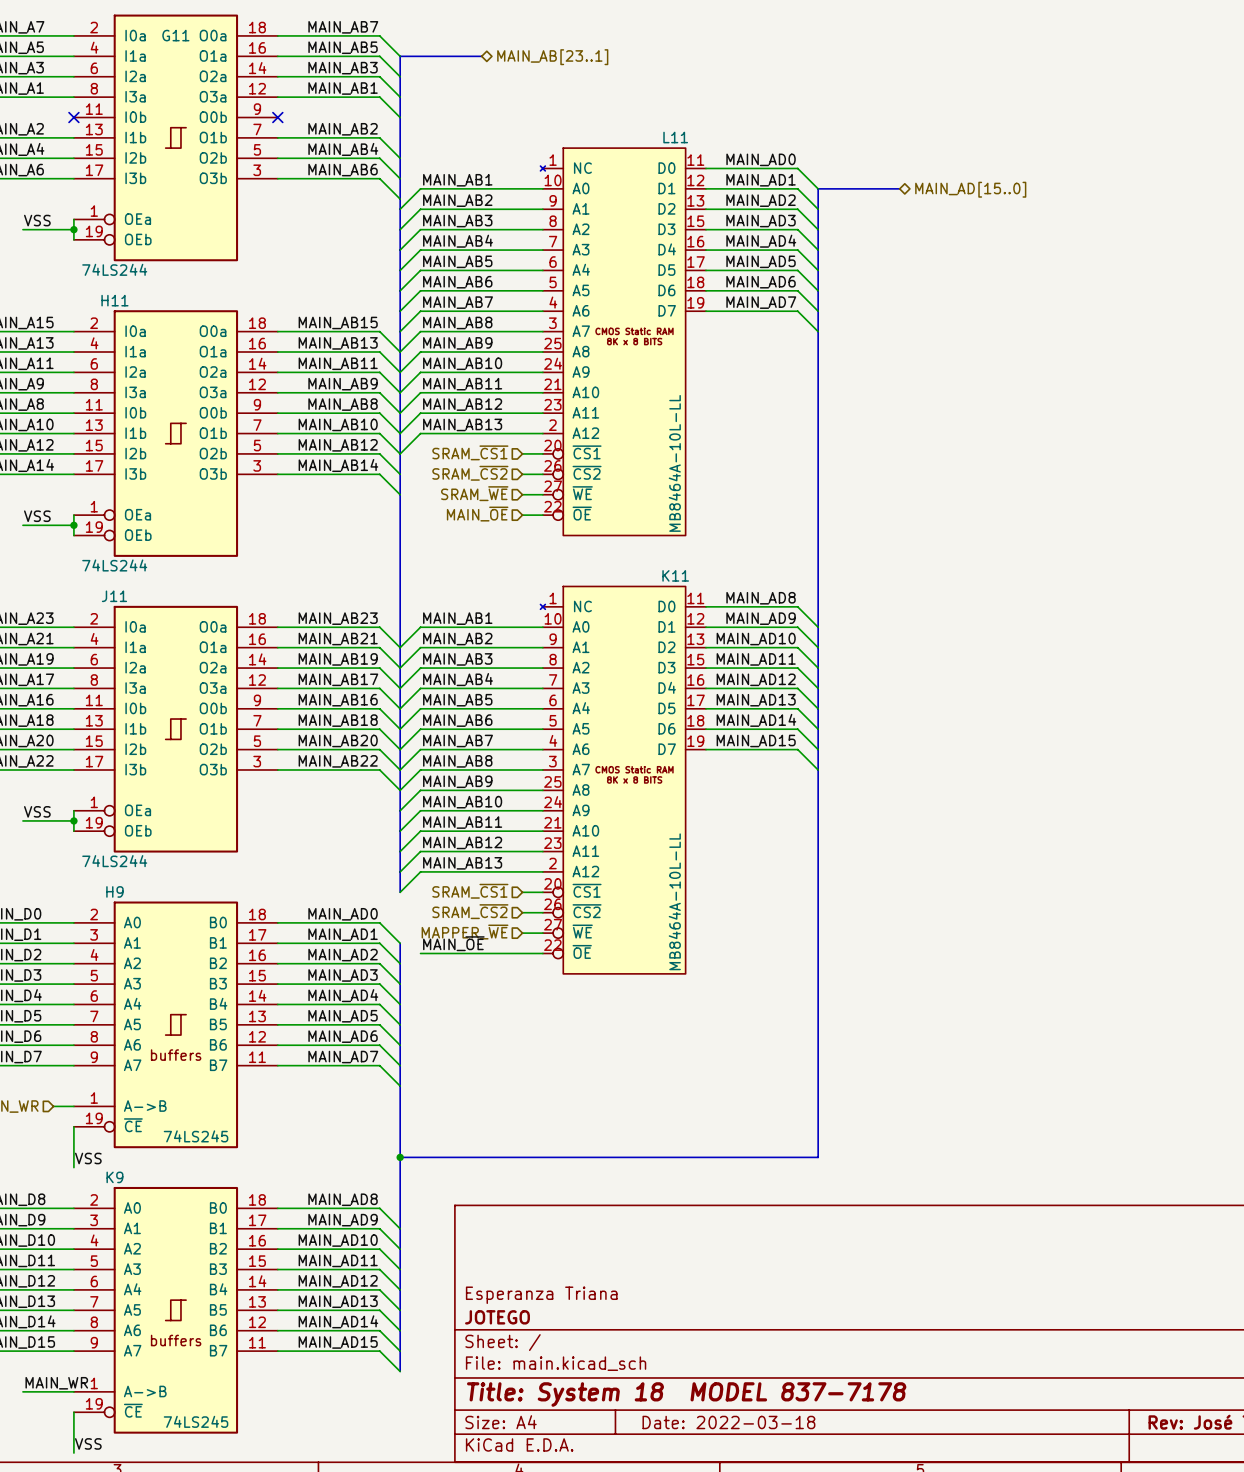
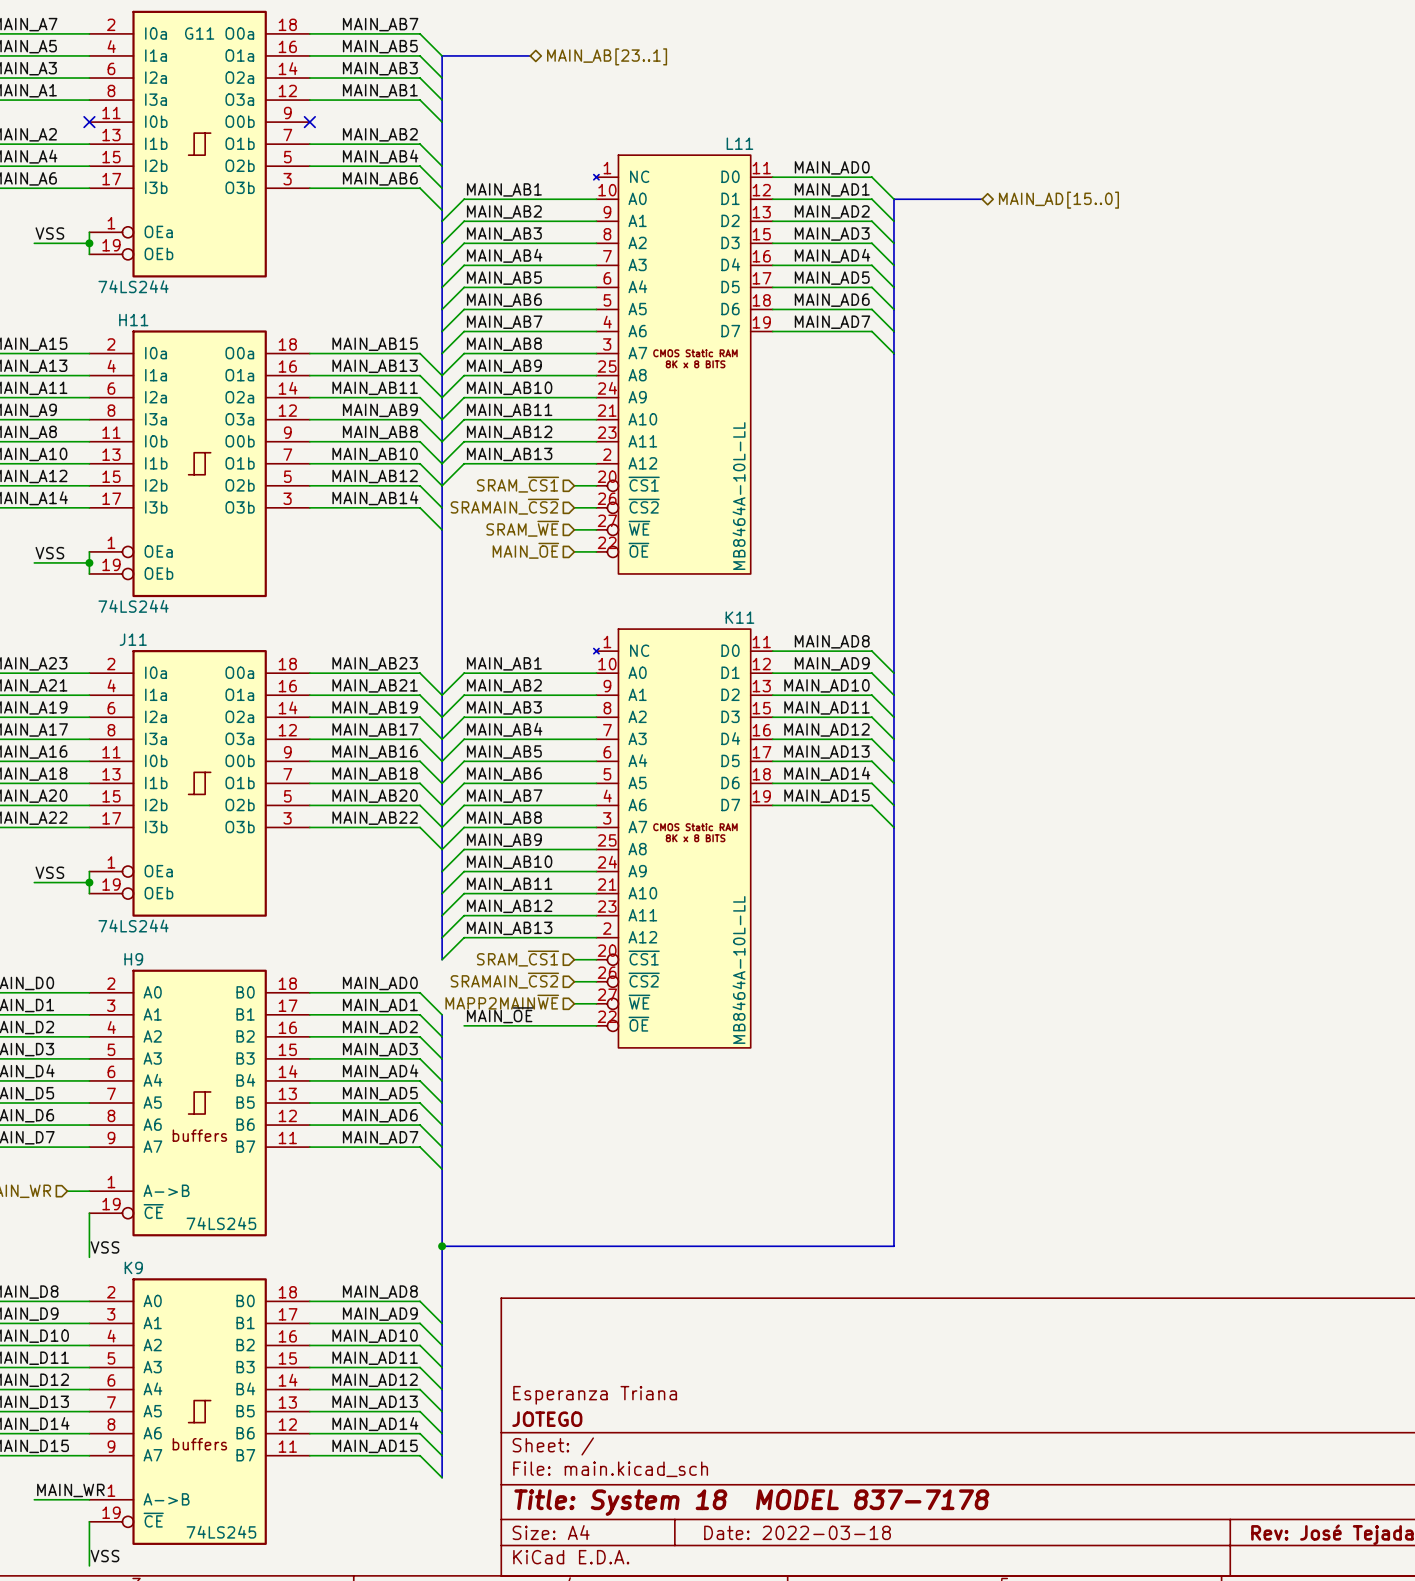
hierarchical label: SRAM_~{CS2} (470, 473) -> SRAMAIN_~{CS2} (504, 506)
hierarchical label: SRAM_~{CS2} (470, 911) -> SRAMAIN_~{CS2} (504, 980)
hierarchical label: MAPPER_~{WE} (465, 932) -> MAPP2MAIN~{WE} (502, 1002)

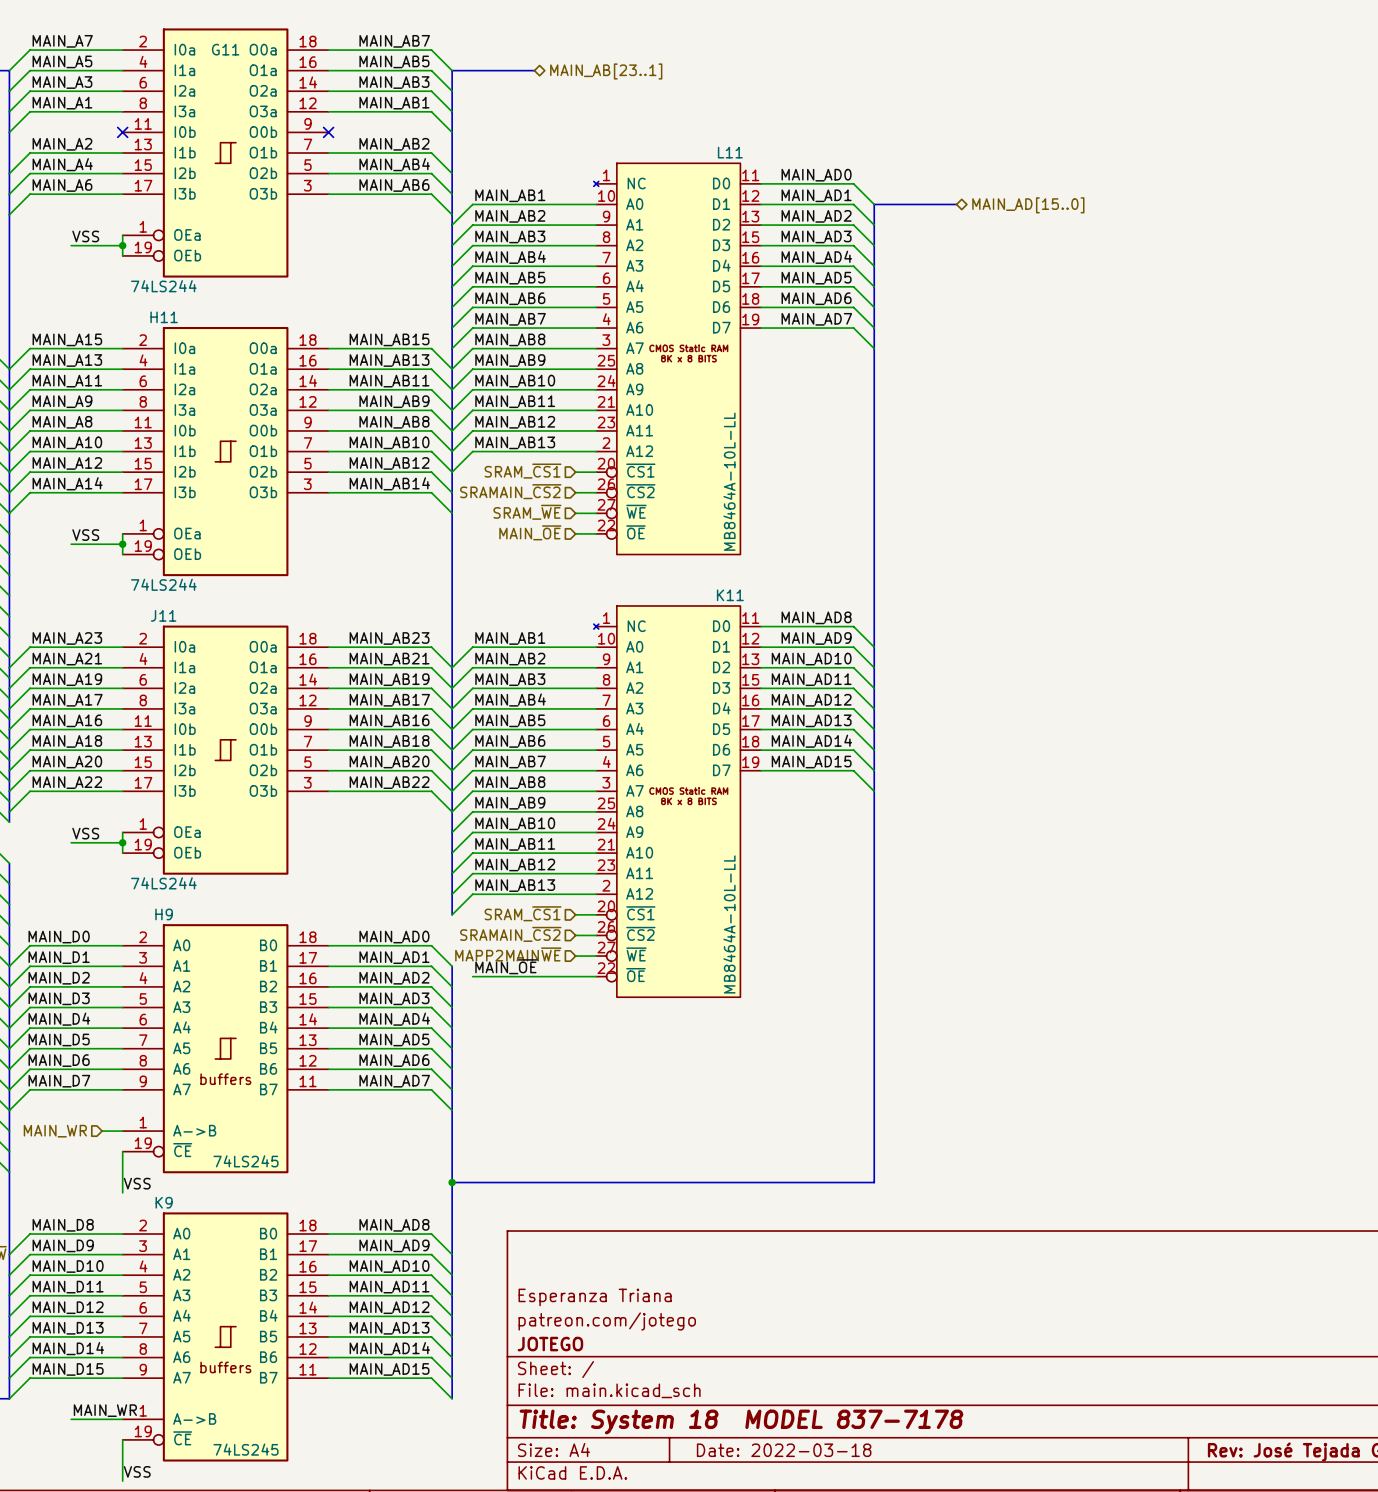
title block: none -> Esperanza Triana (595, 1297)
title block: Esperanza Triana (595, 1395) -> patreon.com/jotego (607, 1321)

